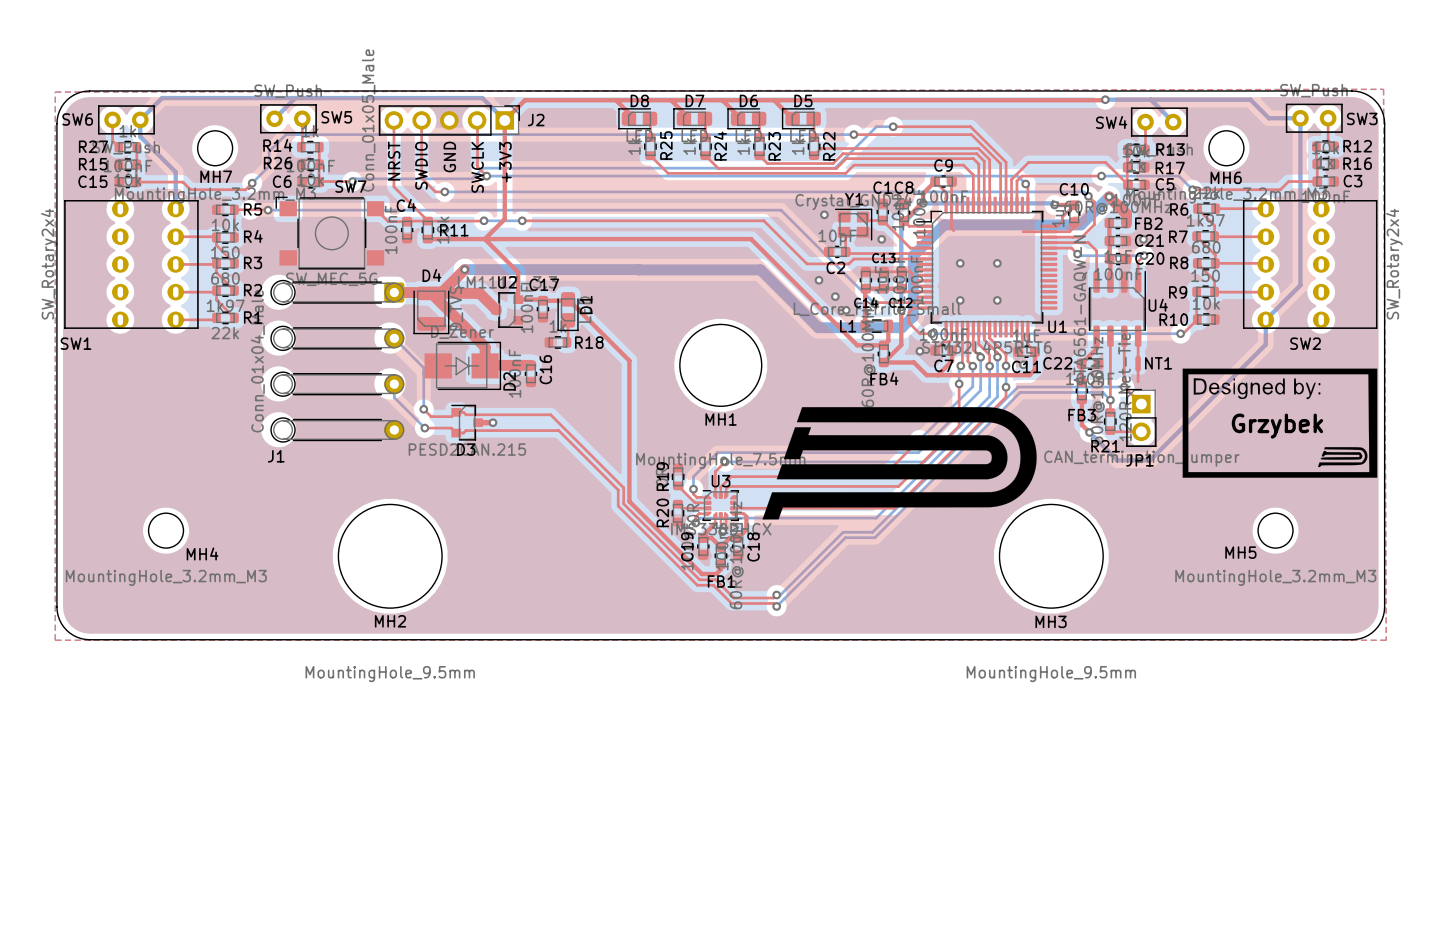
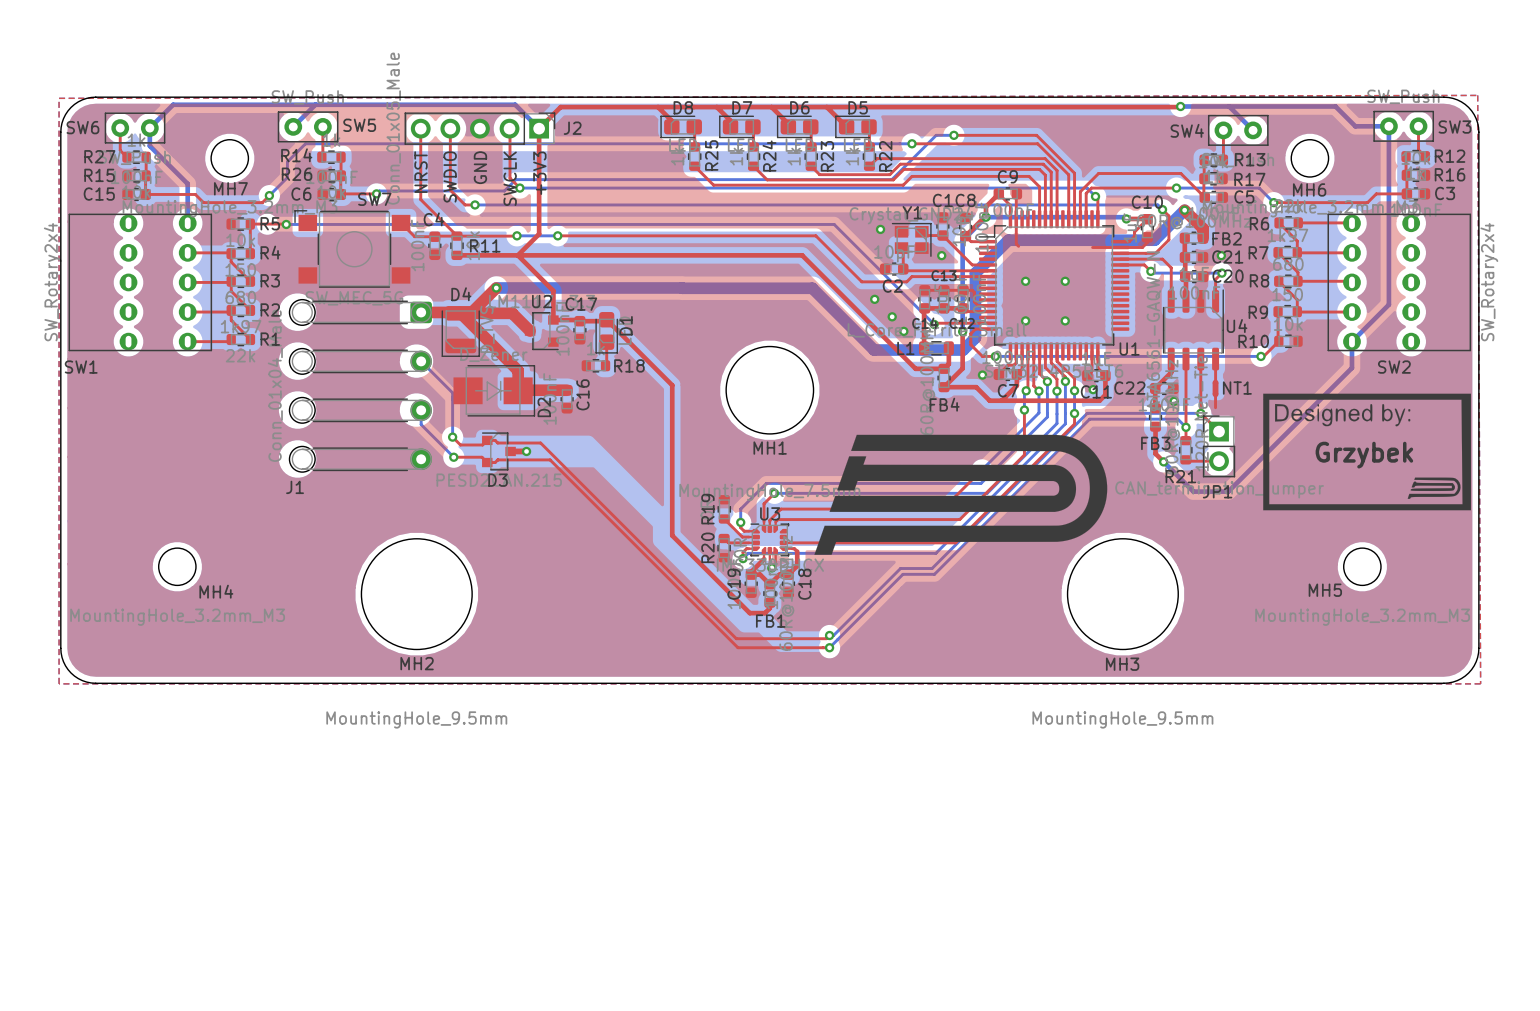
top track: (506, 414) (550, 414) (623, 487) (623, 503) (699, 579) (715, 579) (733, 598) -> (540, 443) (736, 638) (783, 638)
top track: (515, 430) (558, 430) (618, 490) (618, 506) (697, 585) (713, 585) (731, 603) (773, 603) (776, 606) -> (550, 459) (737, 647) (829, 647)

